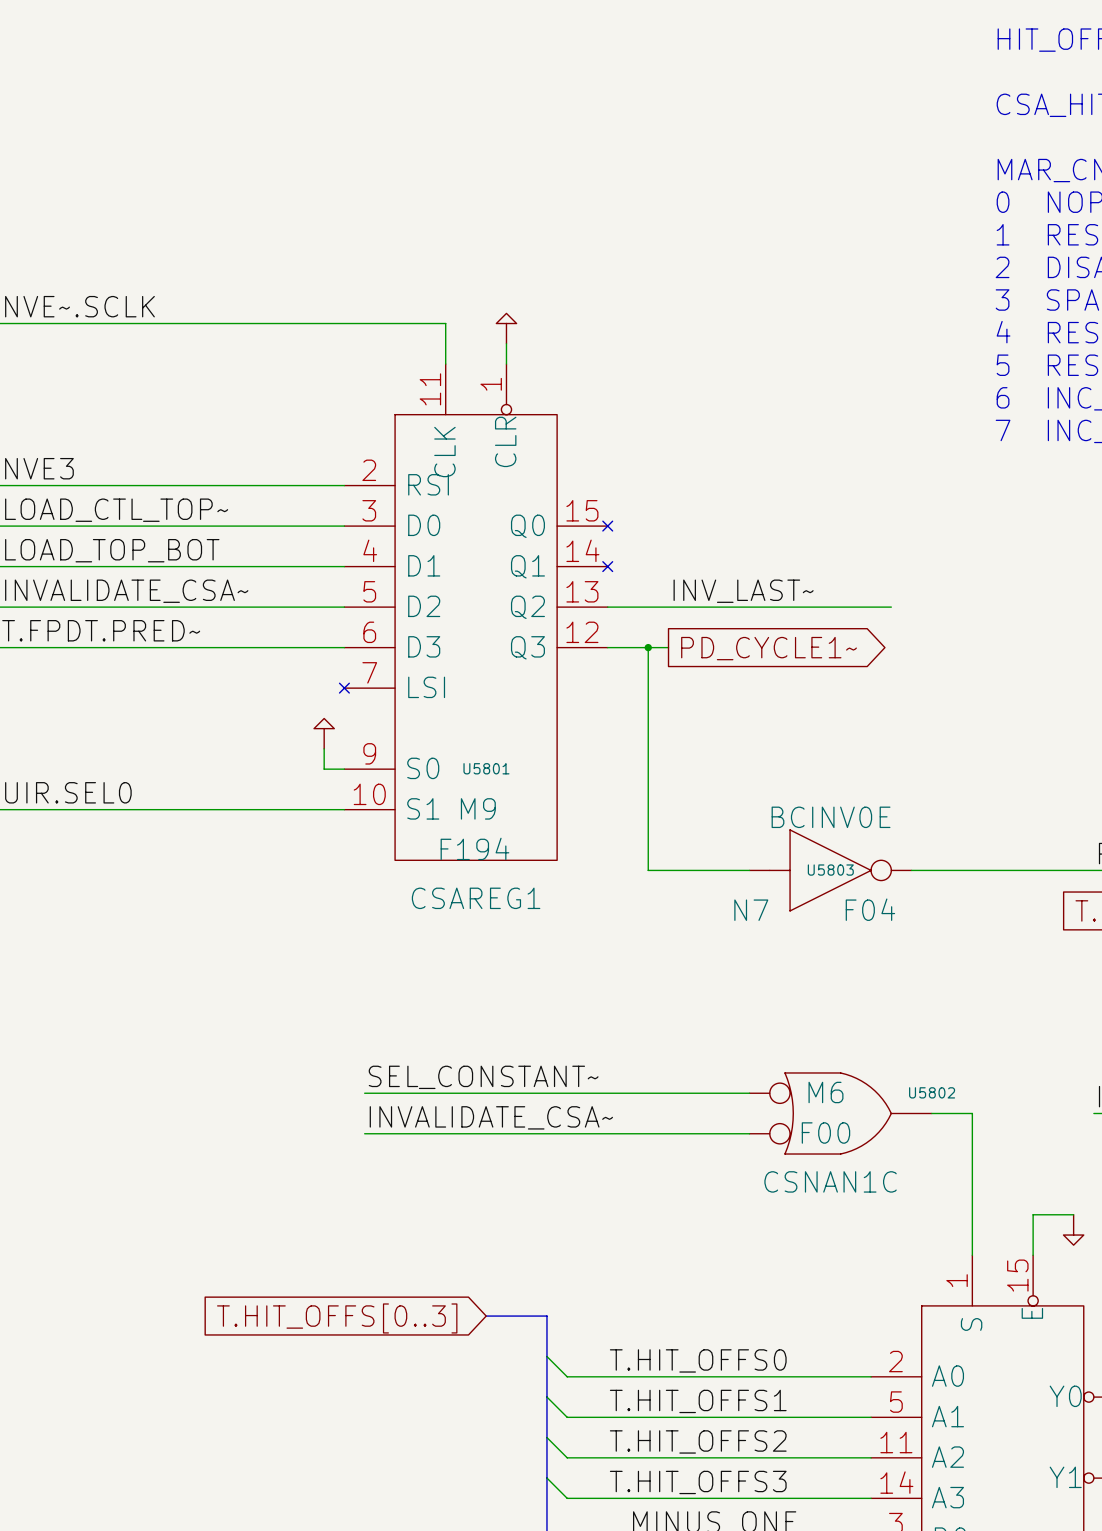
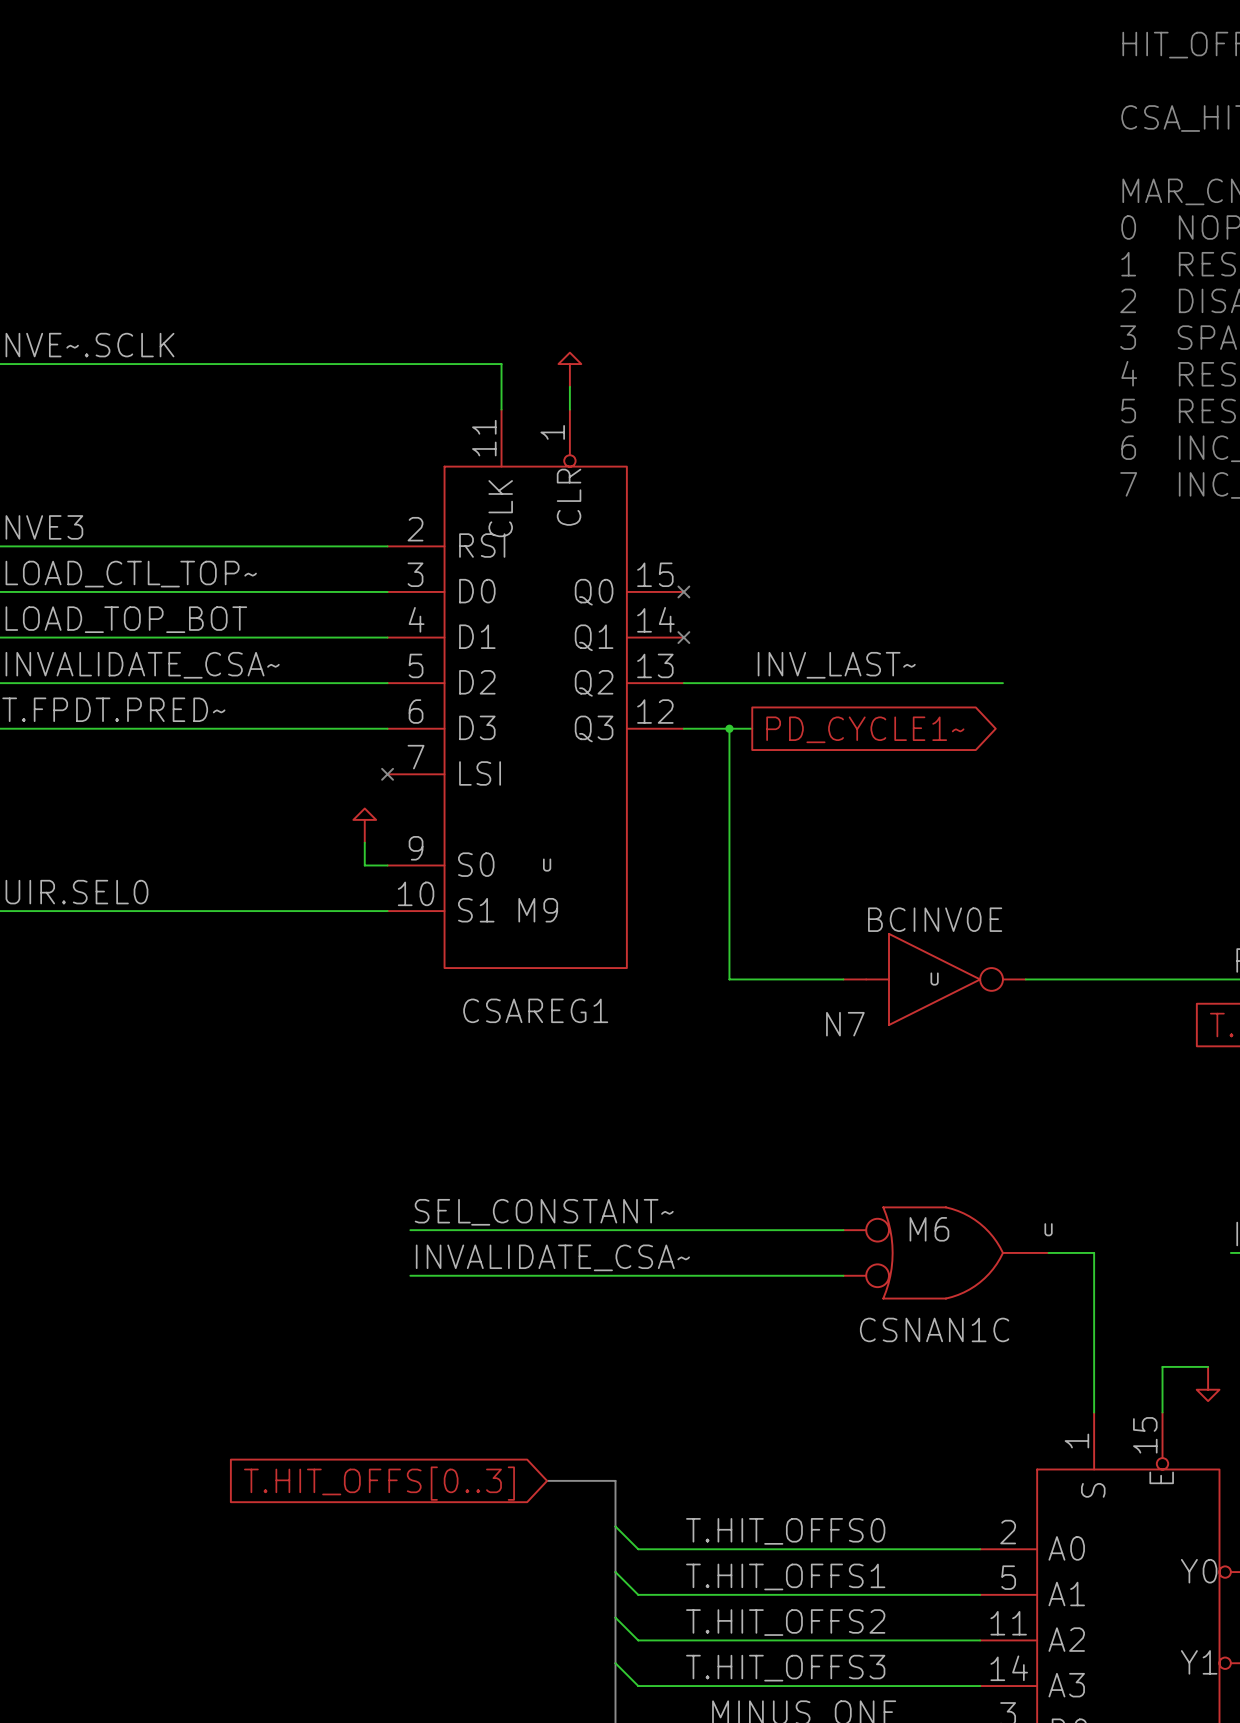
U5801 name: U5801 (486, 768) -> U (547, 865)
U5801 value: F194 (474, 848) -> none
U5803 name: U5803 (830, 870) -> U (934, 979)
U5803 value: F04 (870, 909) -> none
U5802 name: U5802 (932, 1092) -> U (1048, 1229)
U5802 value: F00 (825, 1132) -> none

